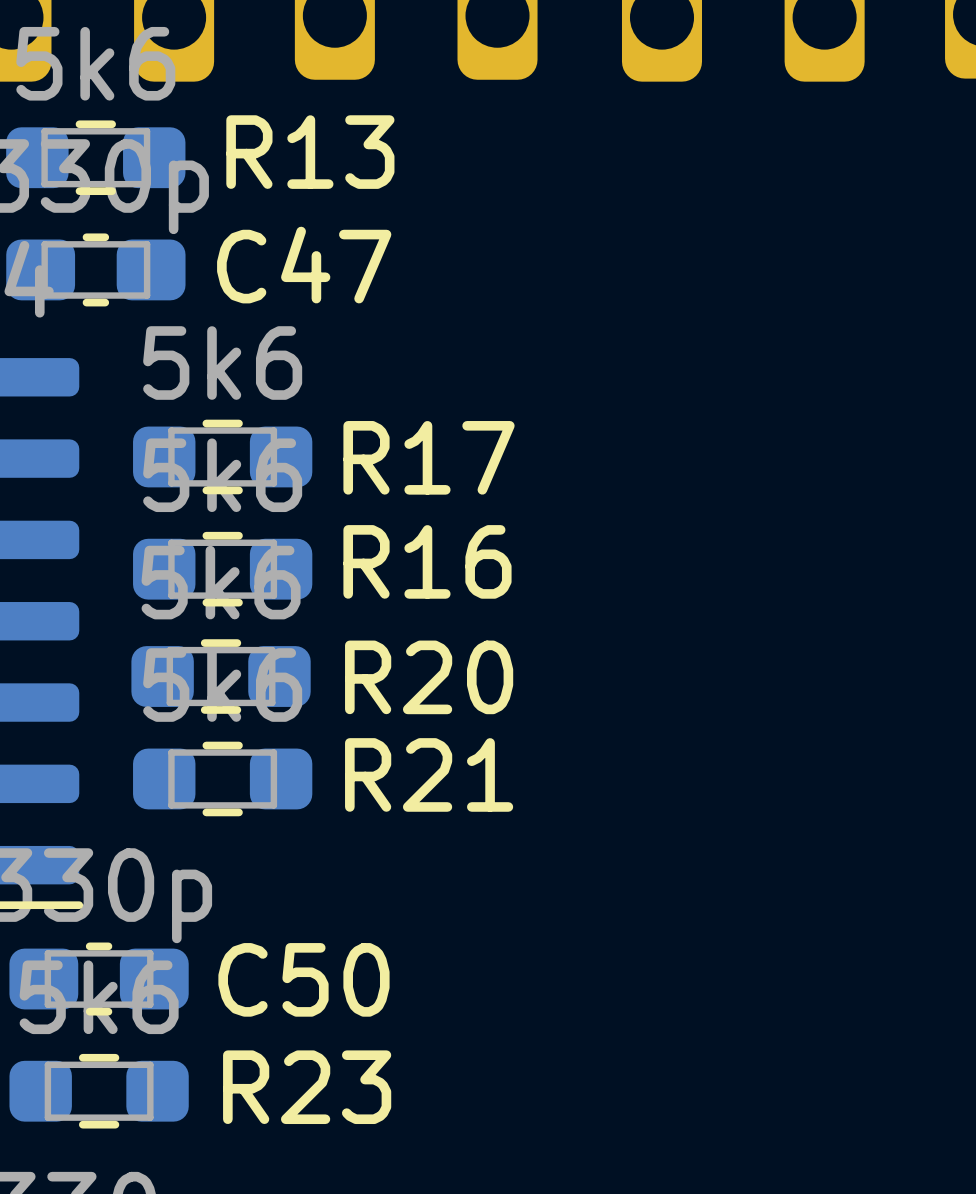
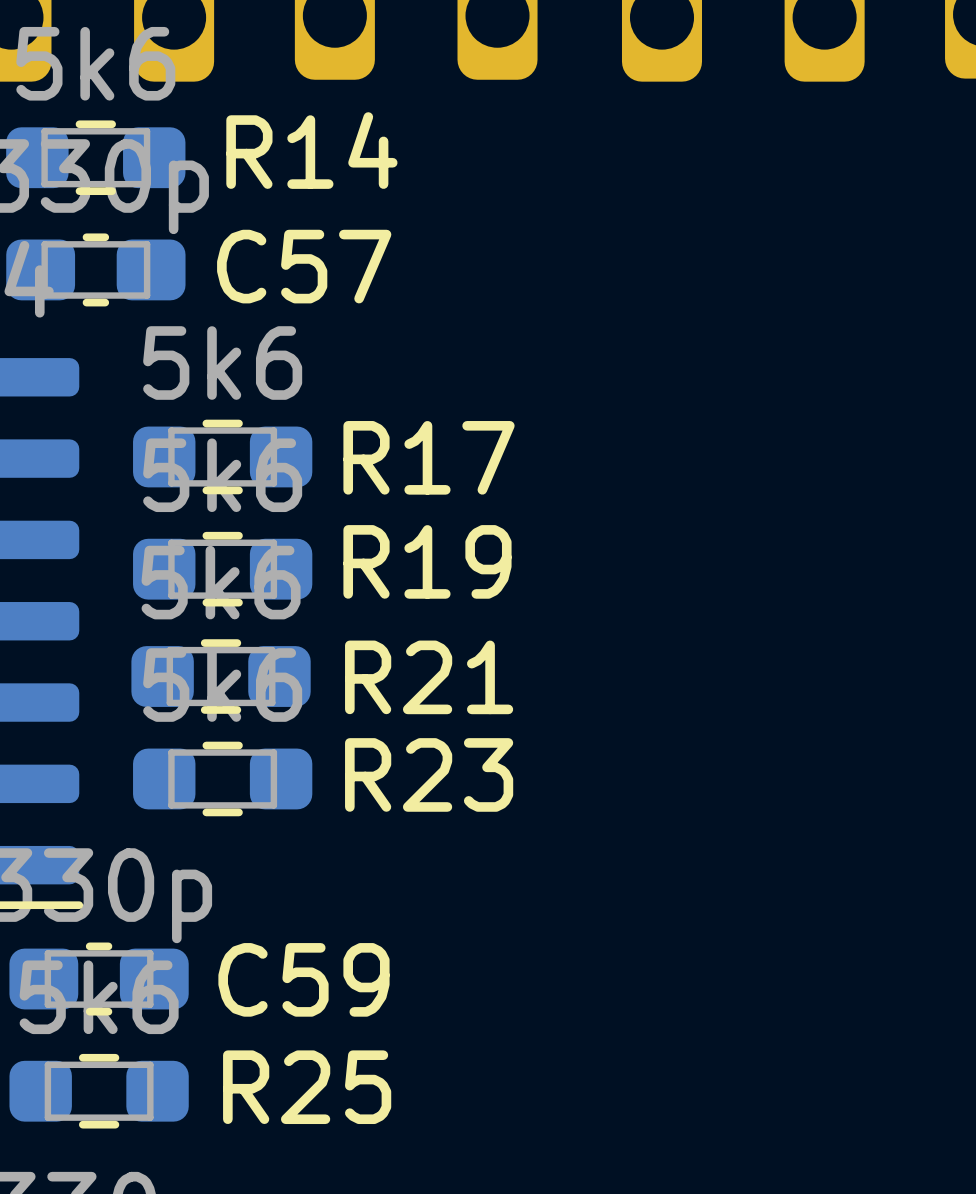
R13 name: R13 (310, 152) -> R14 (311, 150)
C47 name: C47 (304, 265) -> C57 (304, 266)
R16 name: R16 (427, 561) -> R19 (427, 561)
R20 name: R20 (429, 677) -> R21 (429, 677)
R21 name: R21 (429, 774) -> R23 (429, 774)
C50 name: C50 (303, 979) -> C59 (303, 979)
R23 name: R23 (307, 1087) -> R25 (307, 1087)

